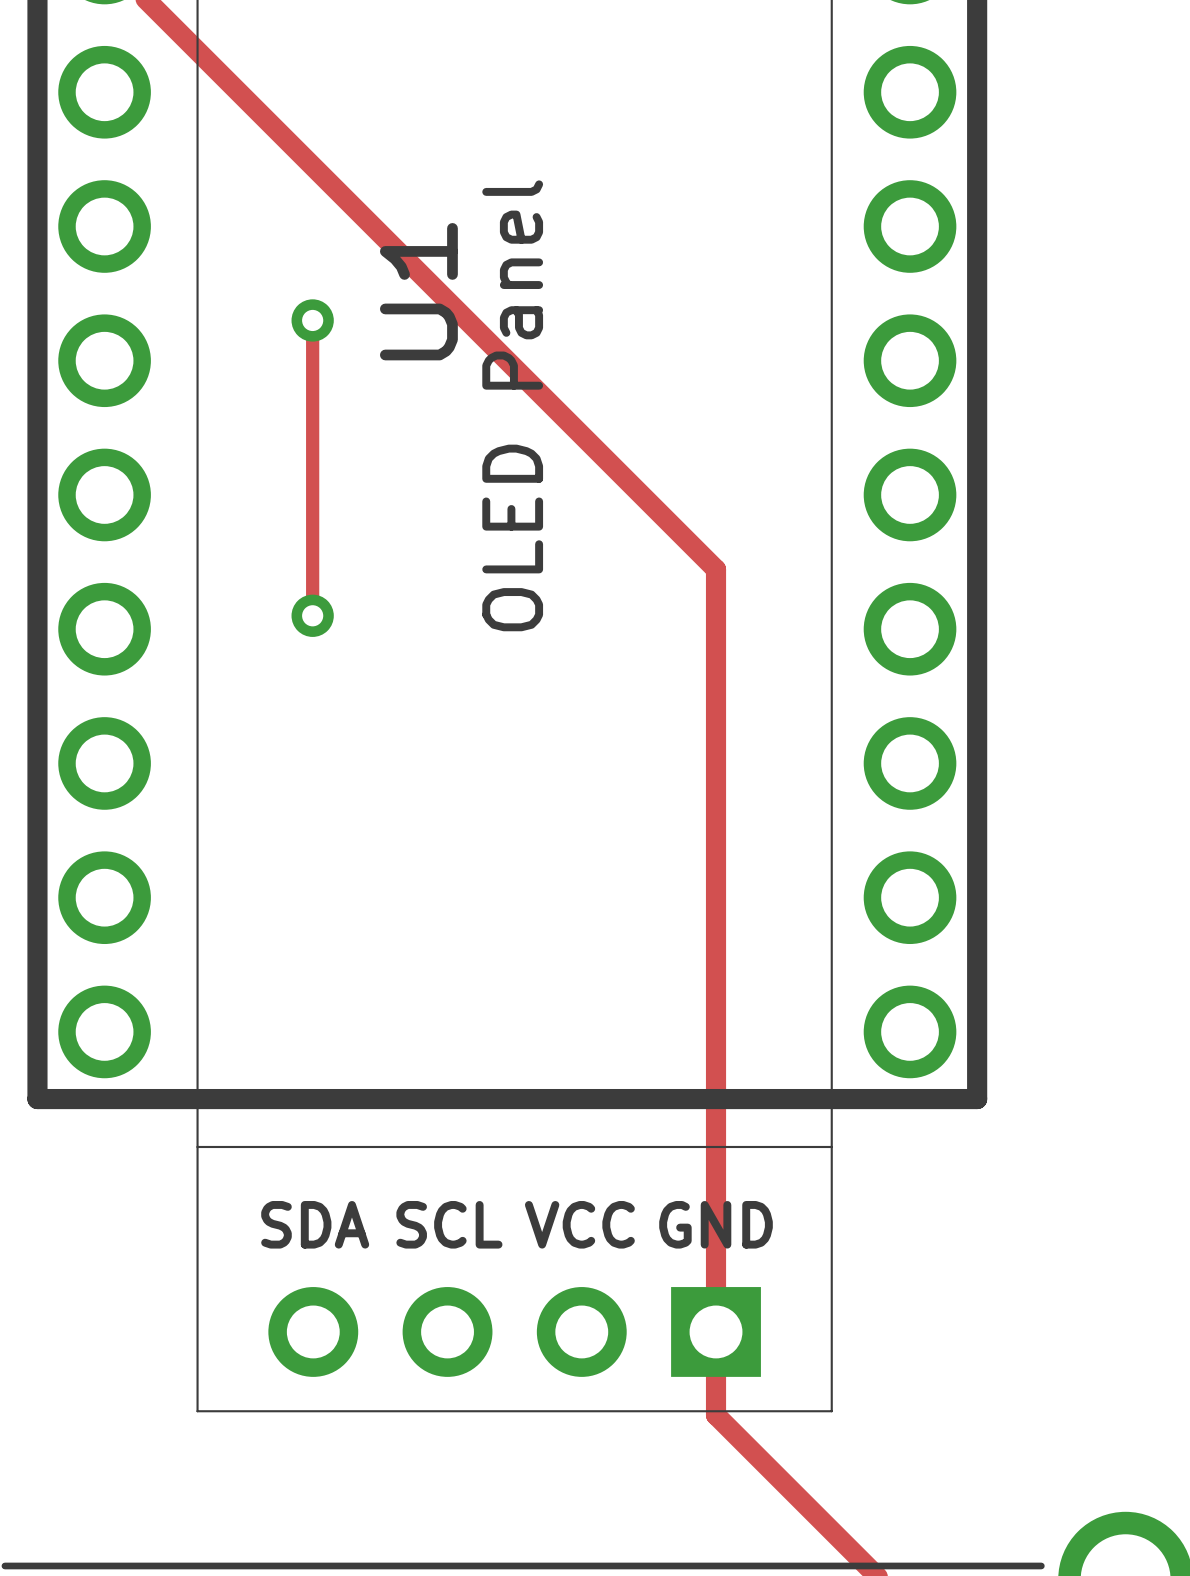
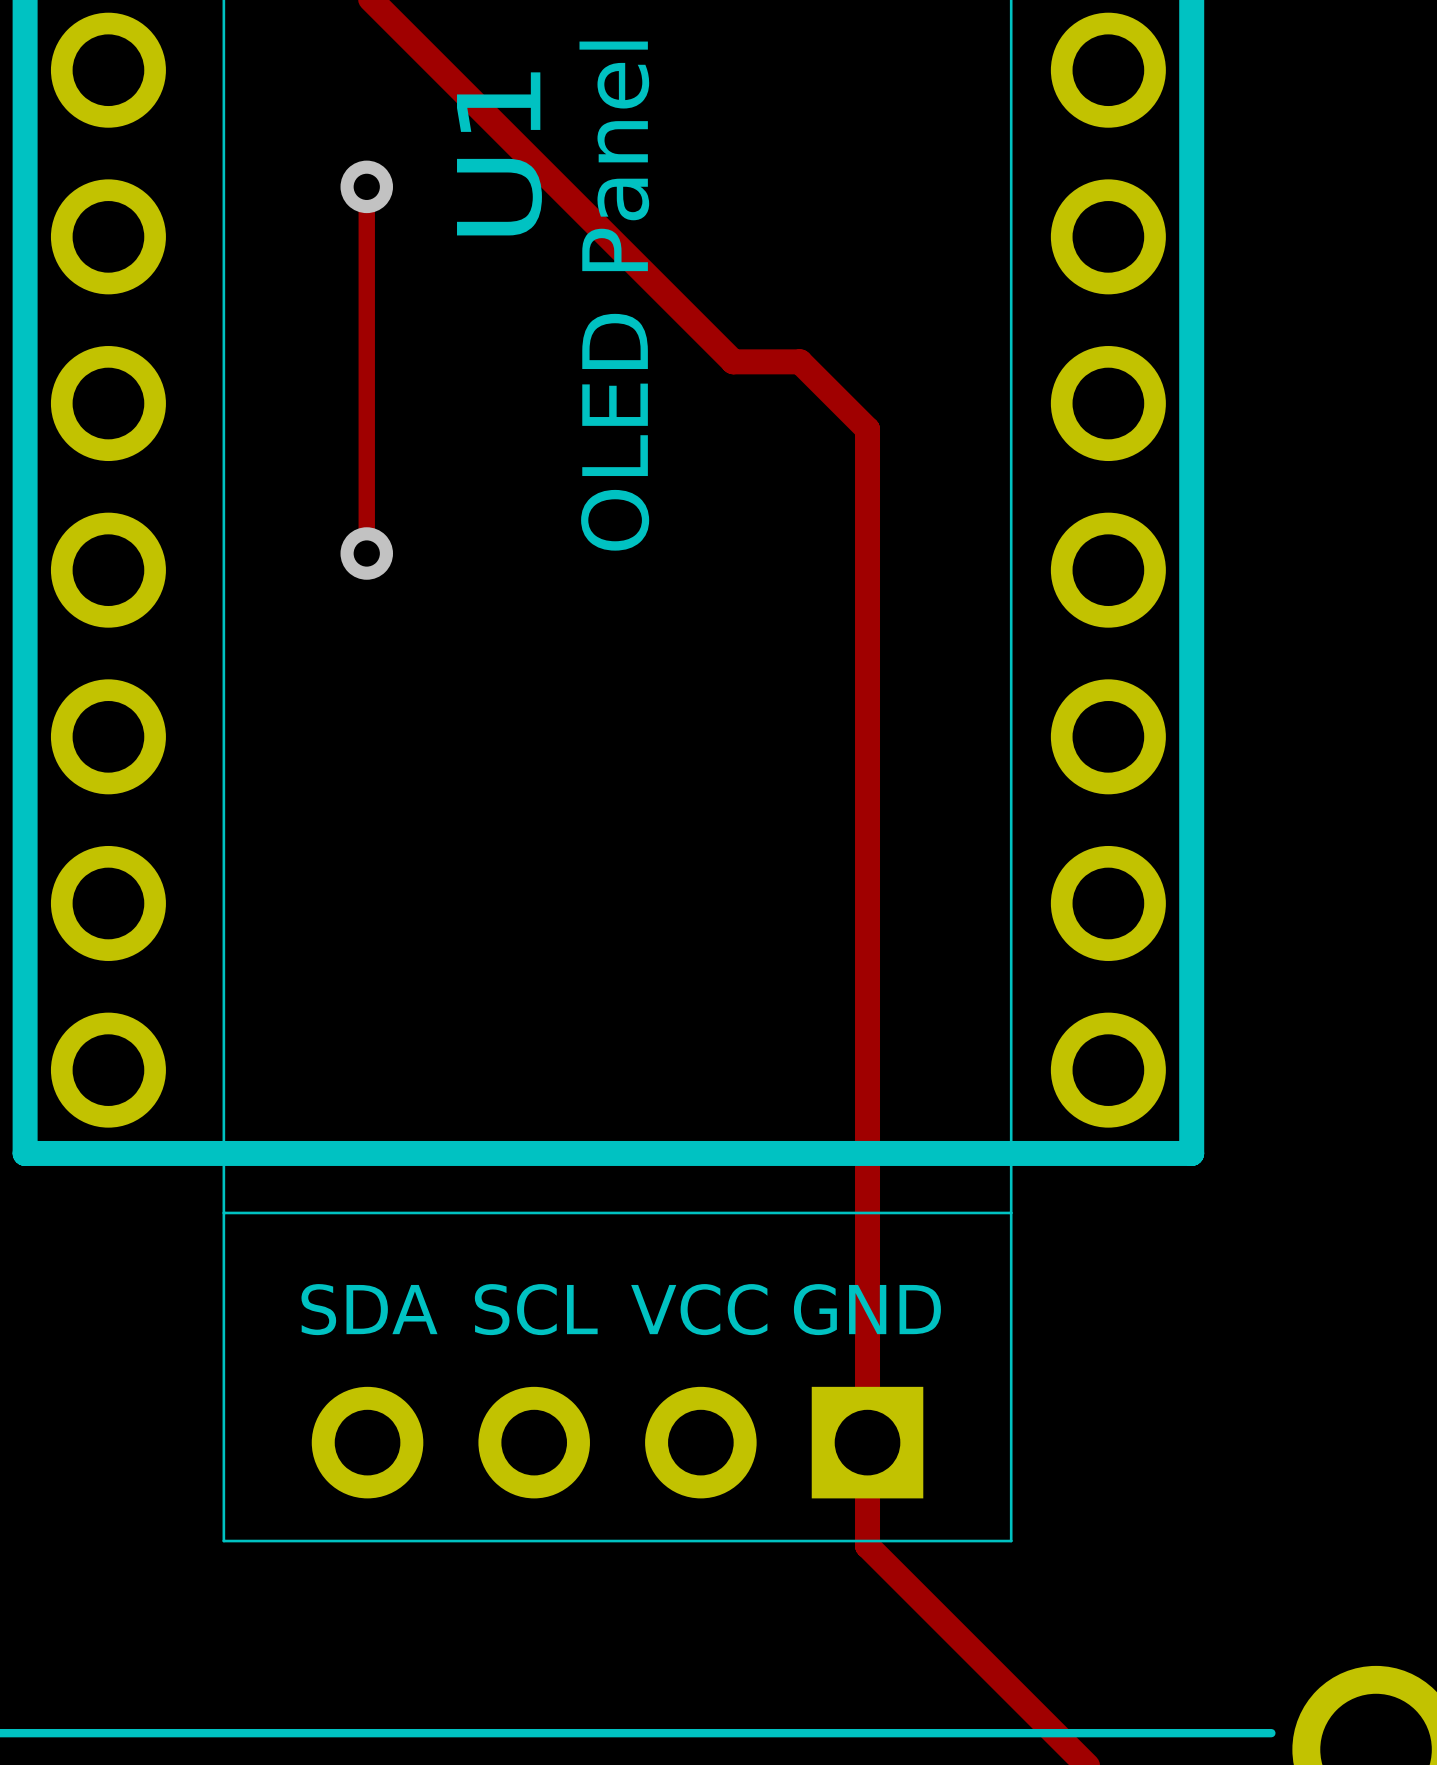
track: (607, 461) (716, 569) -> (733, 361) (800, 361) (867, 429) (867, 495)

